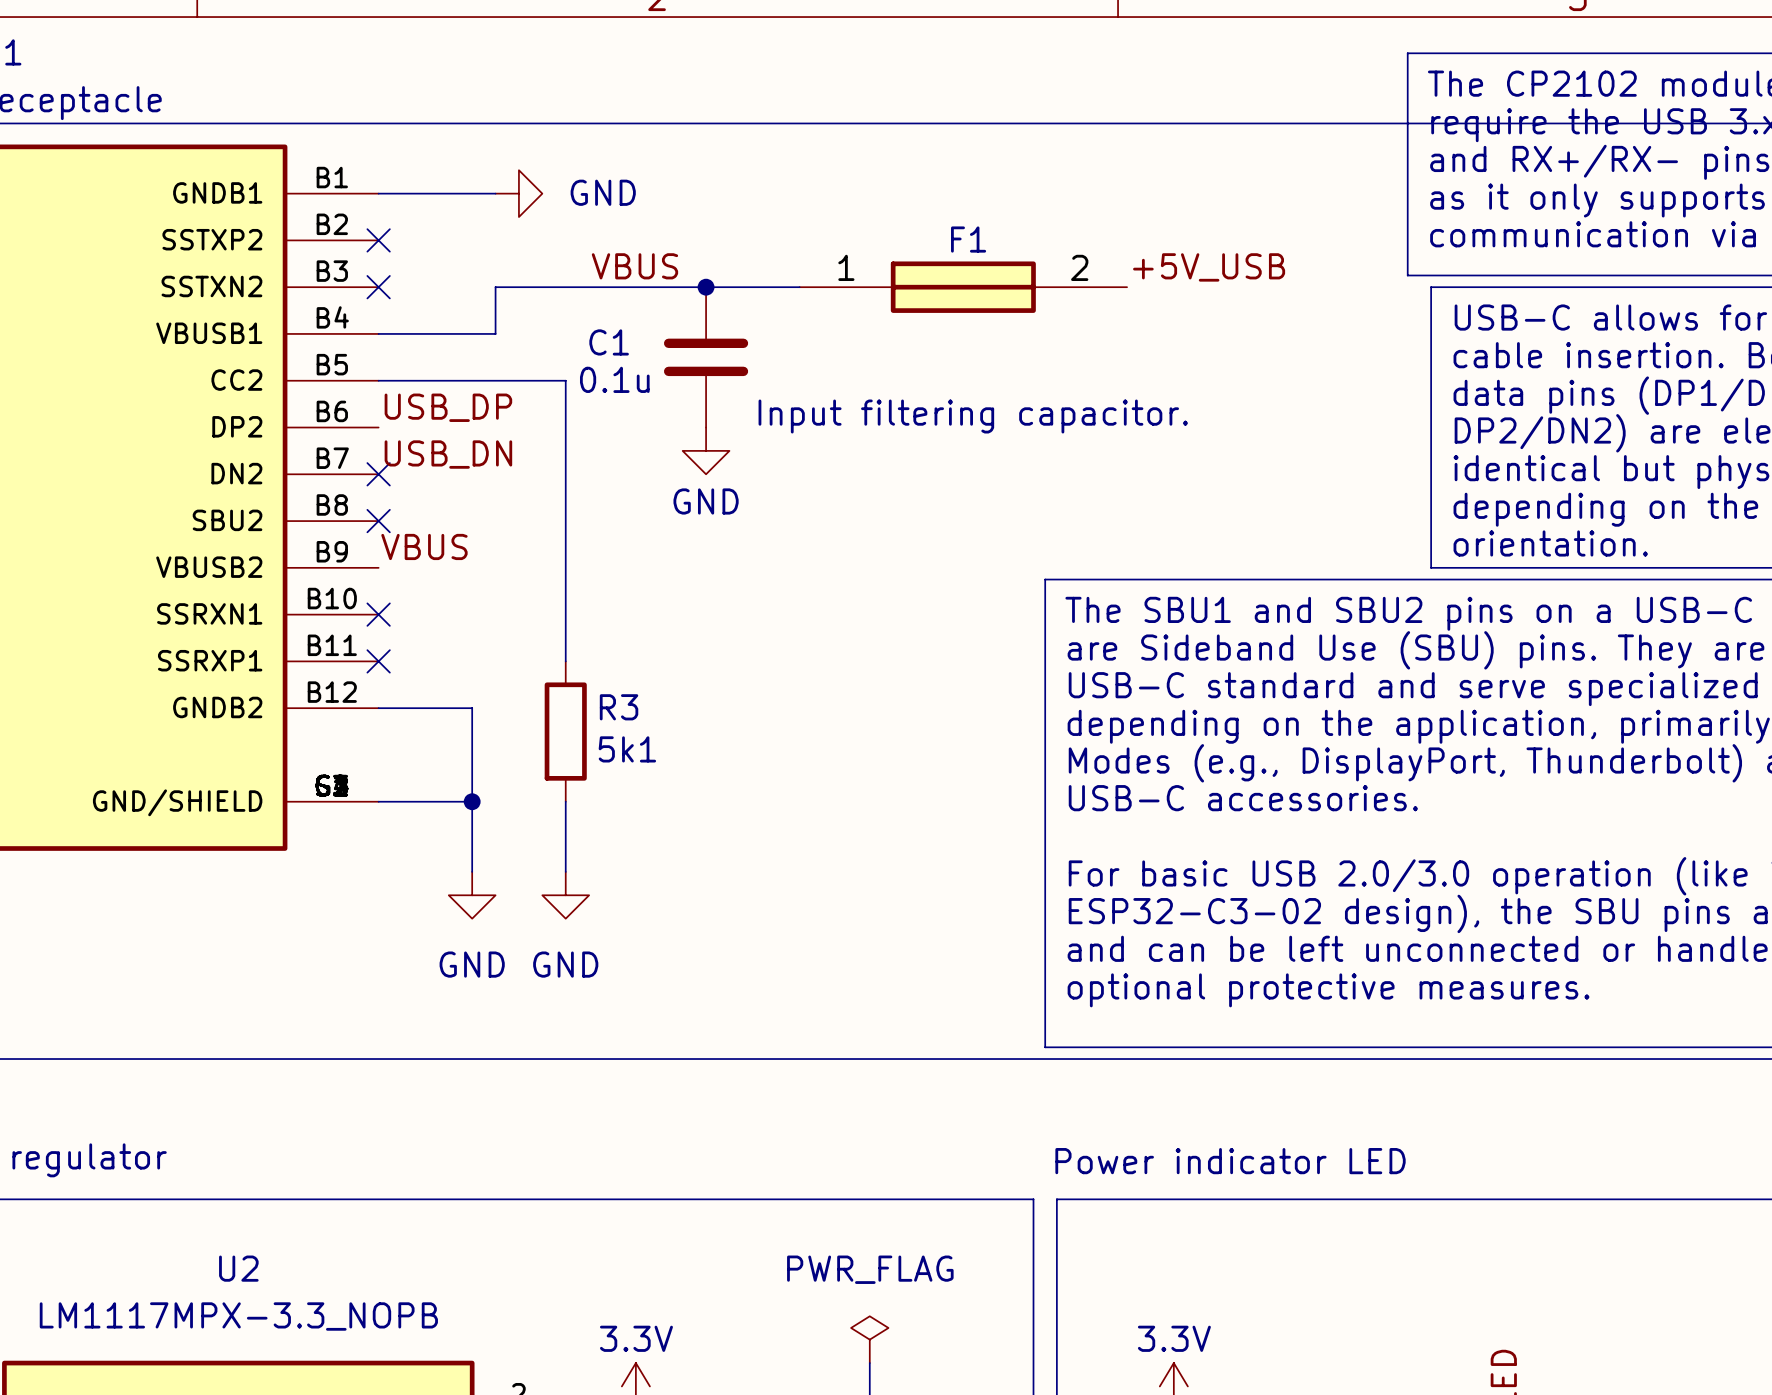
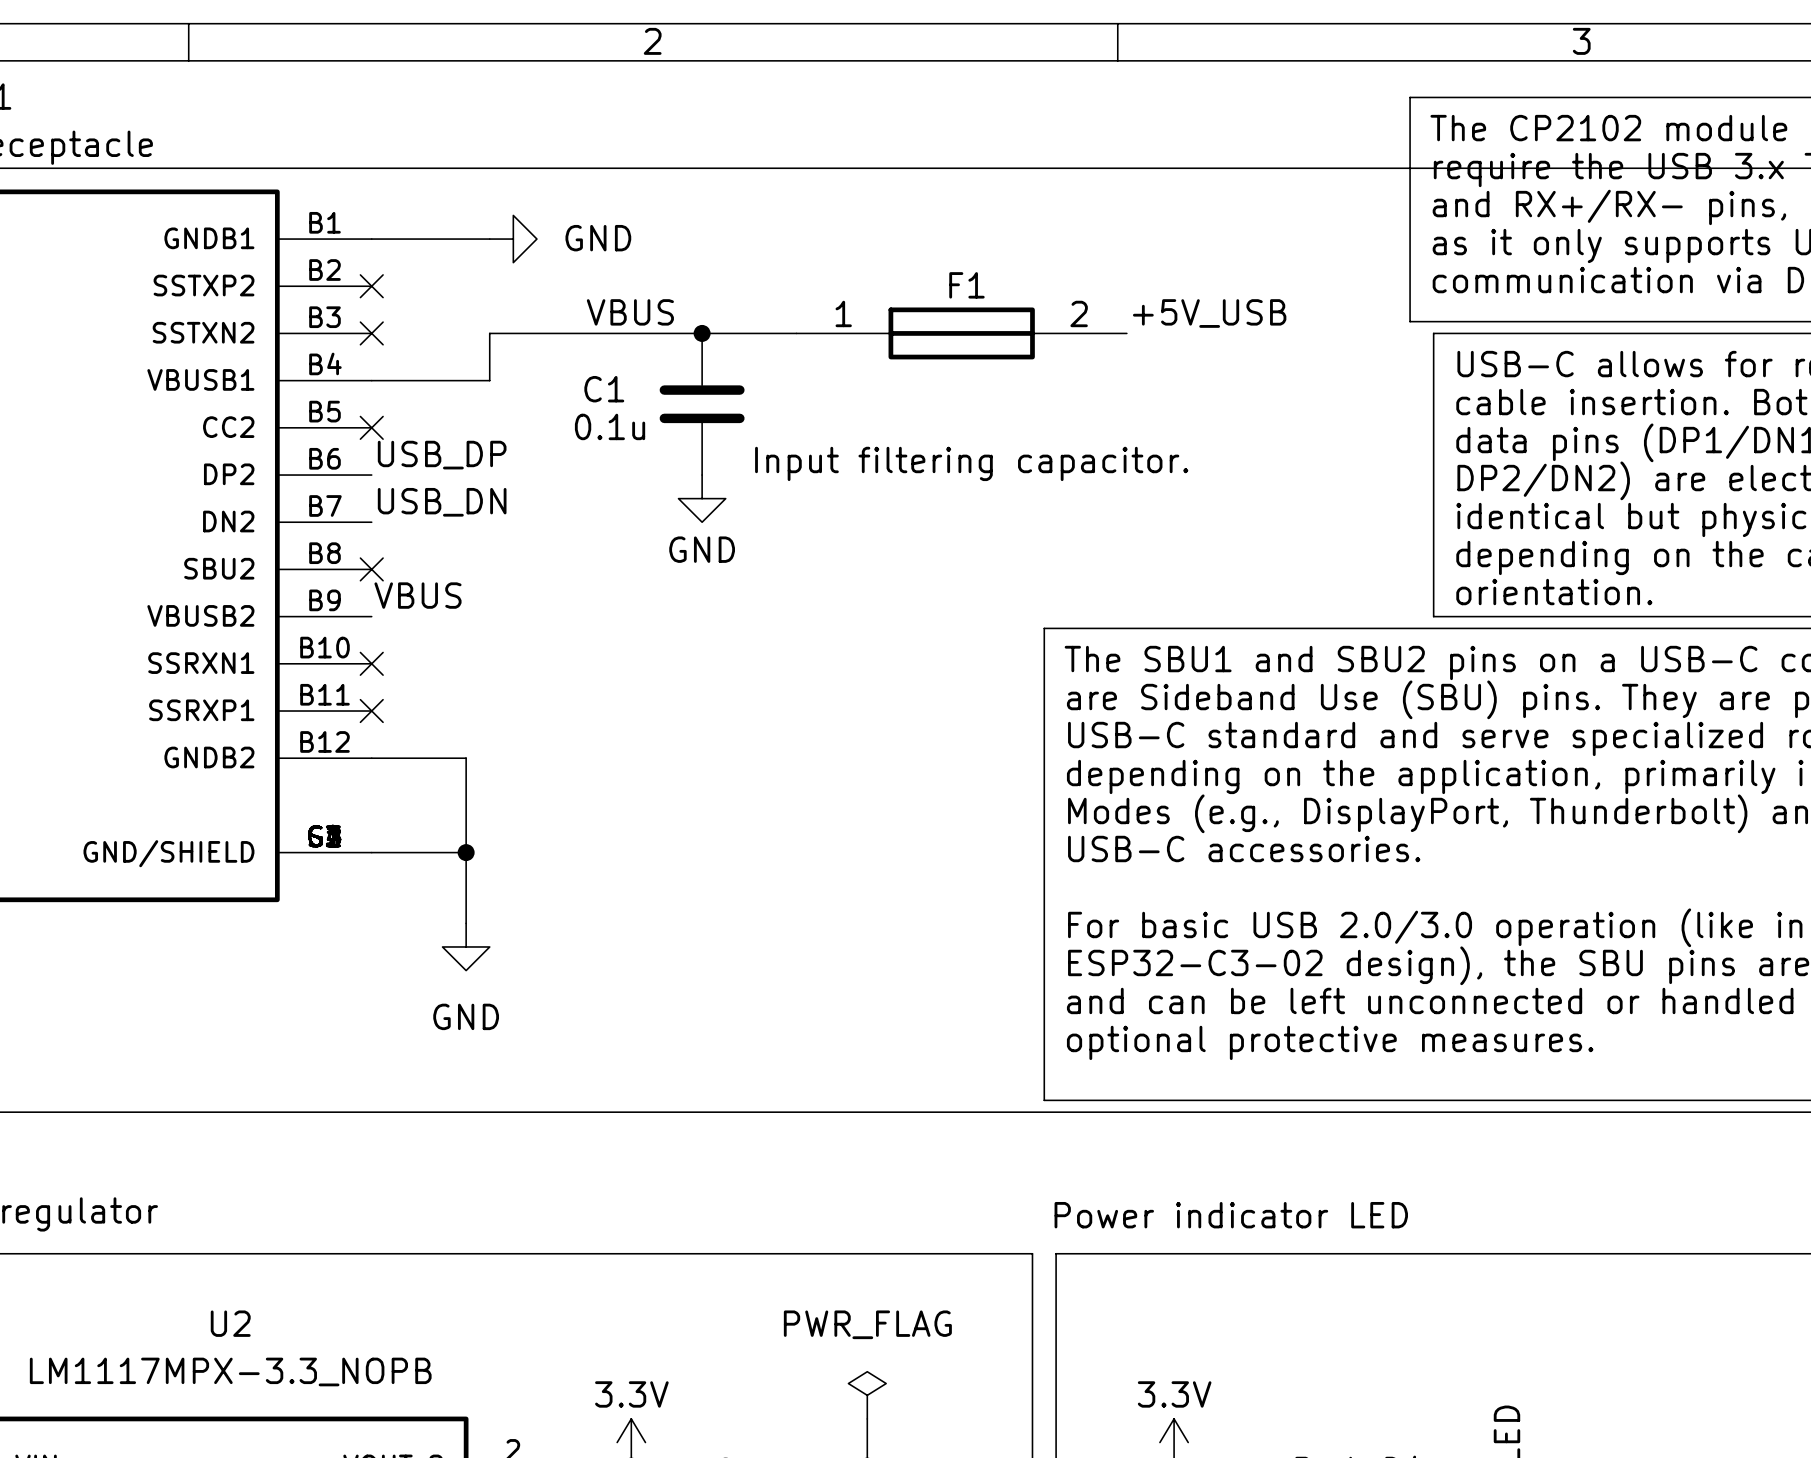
wire: (378, 380) (565, 380) (565, 661) -> none
no-connect mark position: (378, 474) -> (371, 427)
R3: 5k1 (565, 731) -> none
wire: (565, 801) (565, 871) -> none
power symbol: GND (565, 895) -> none

